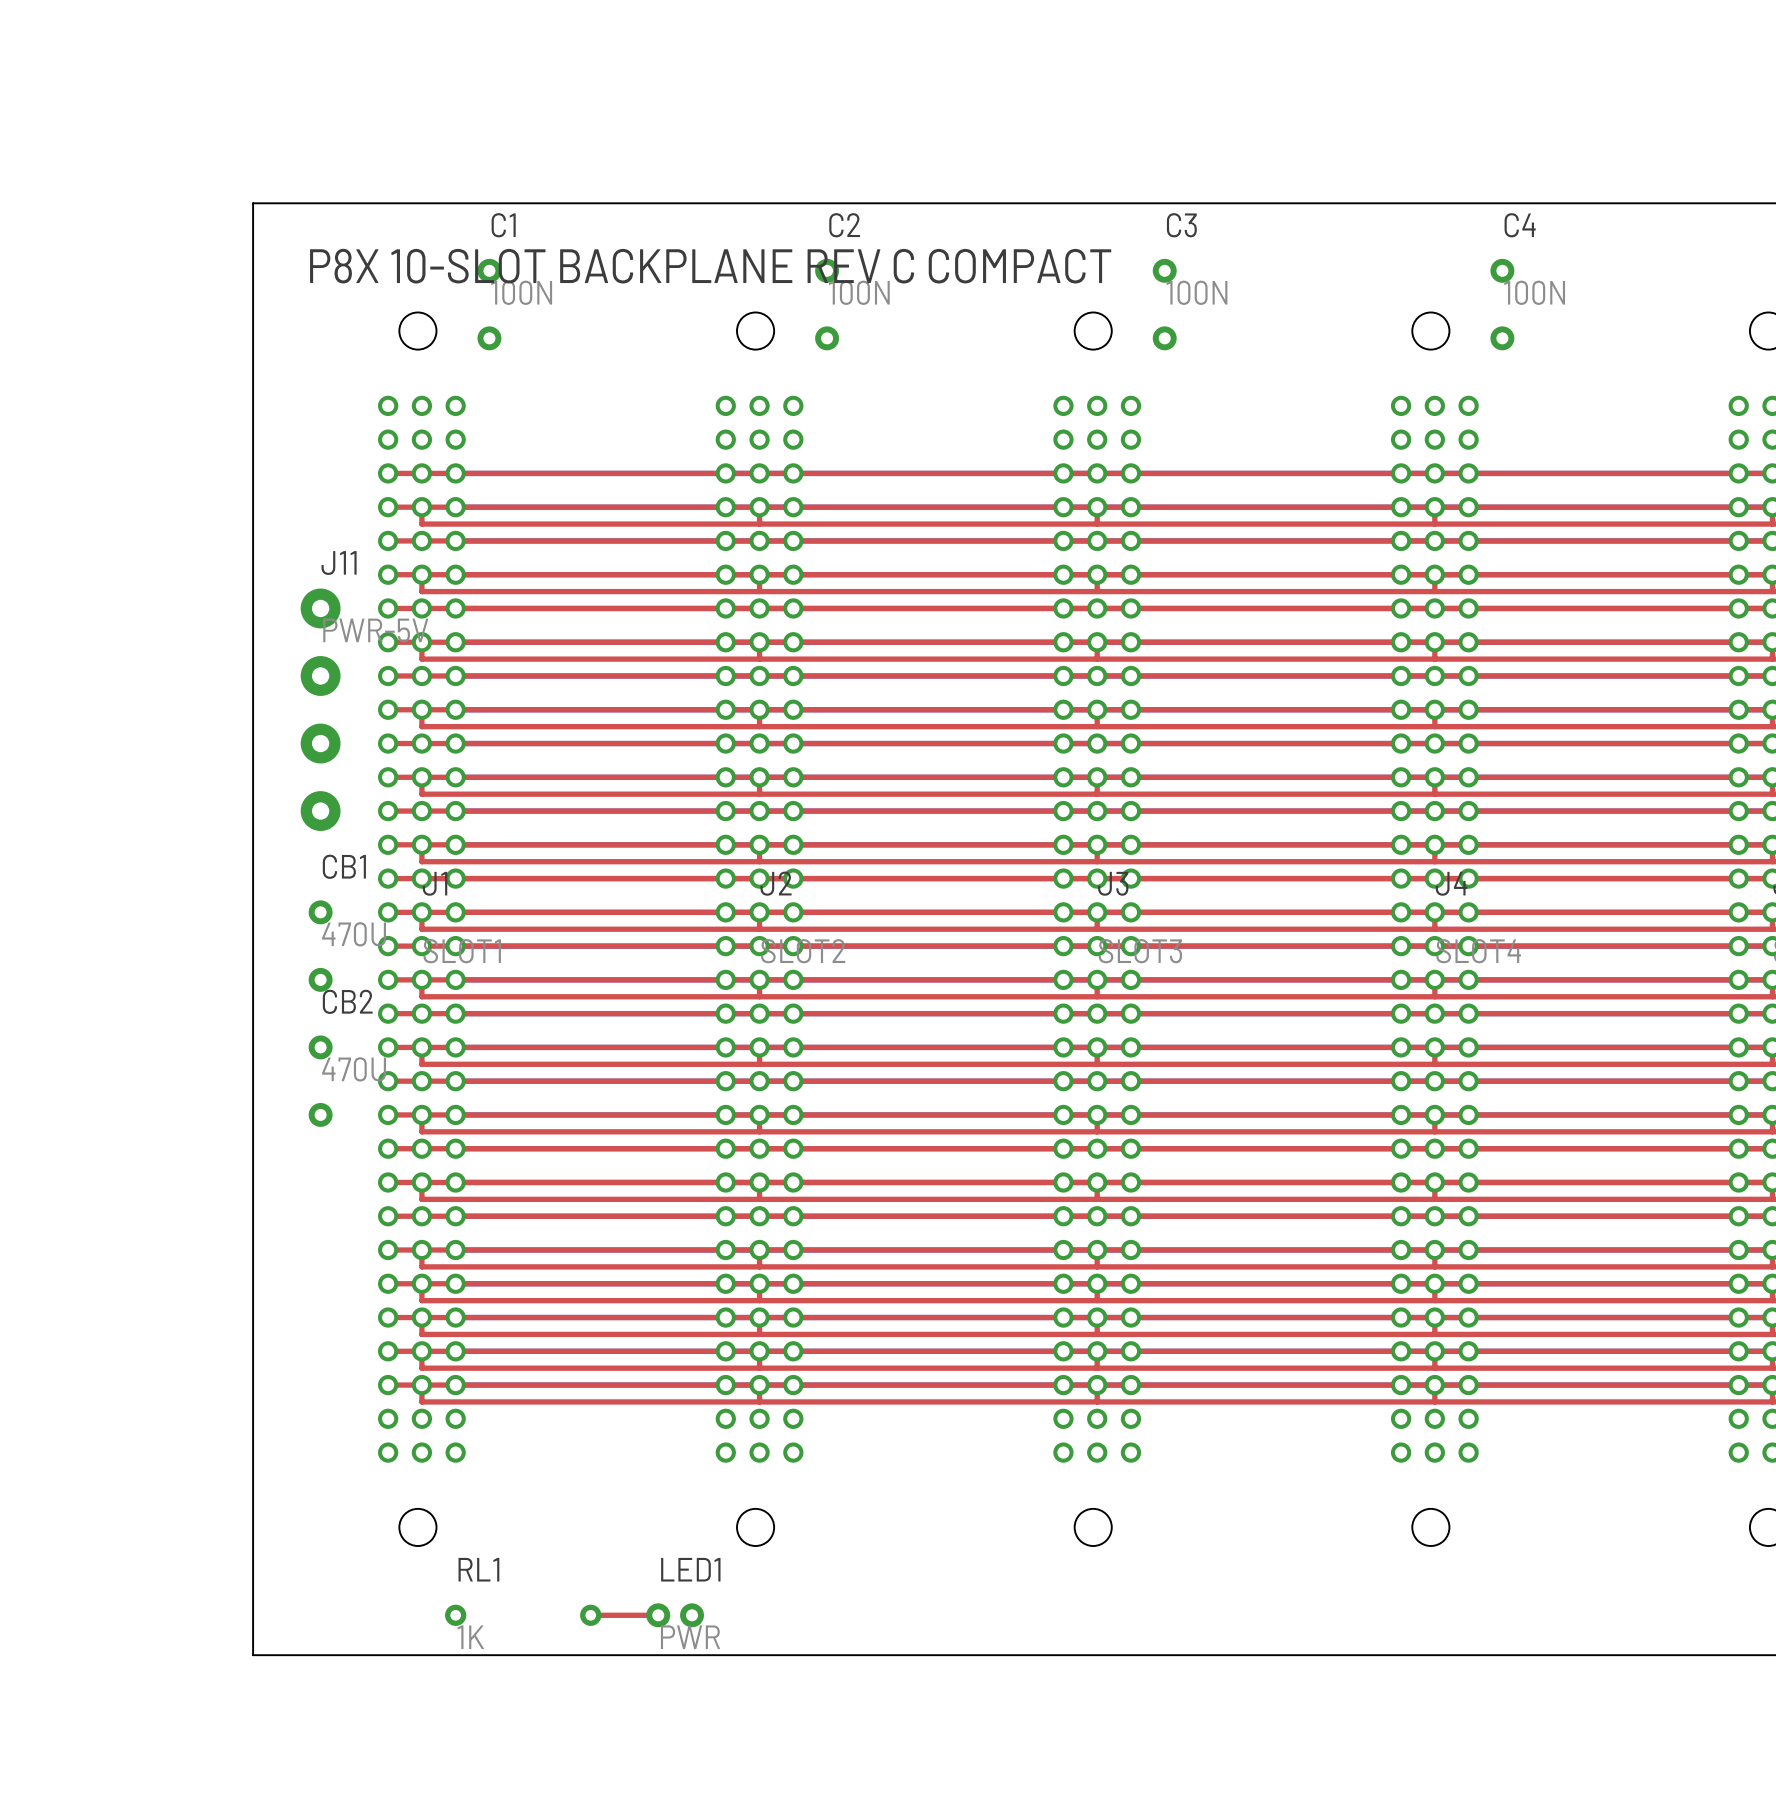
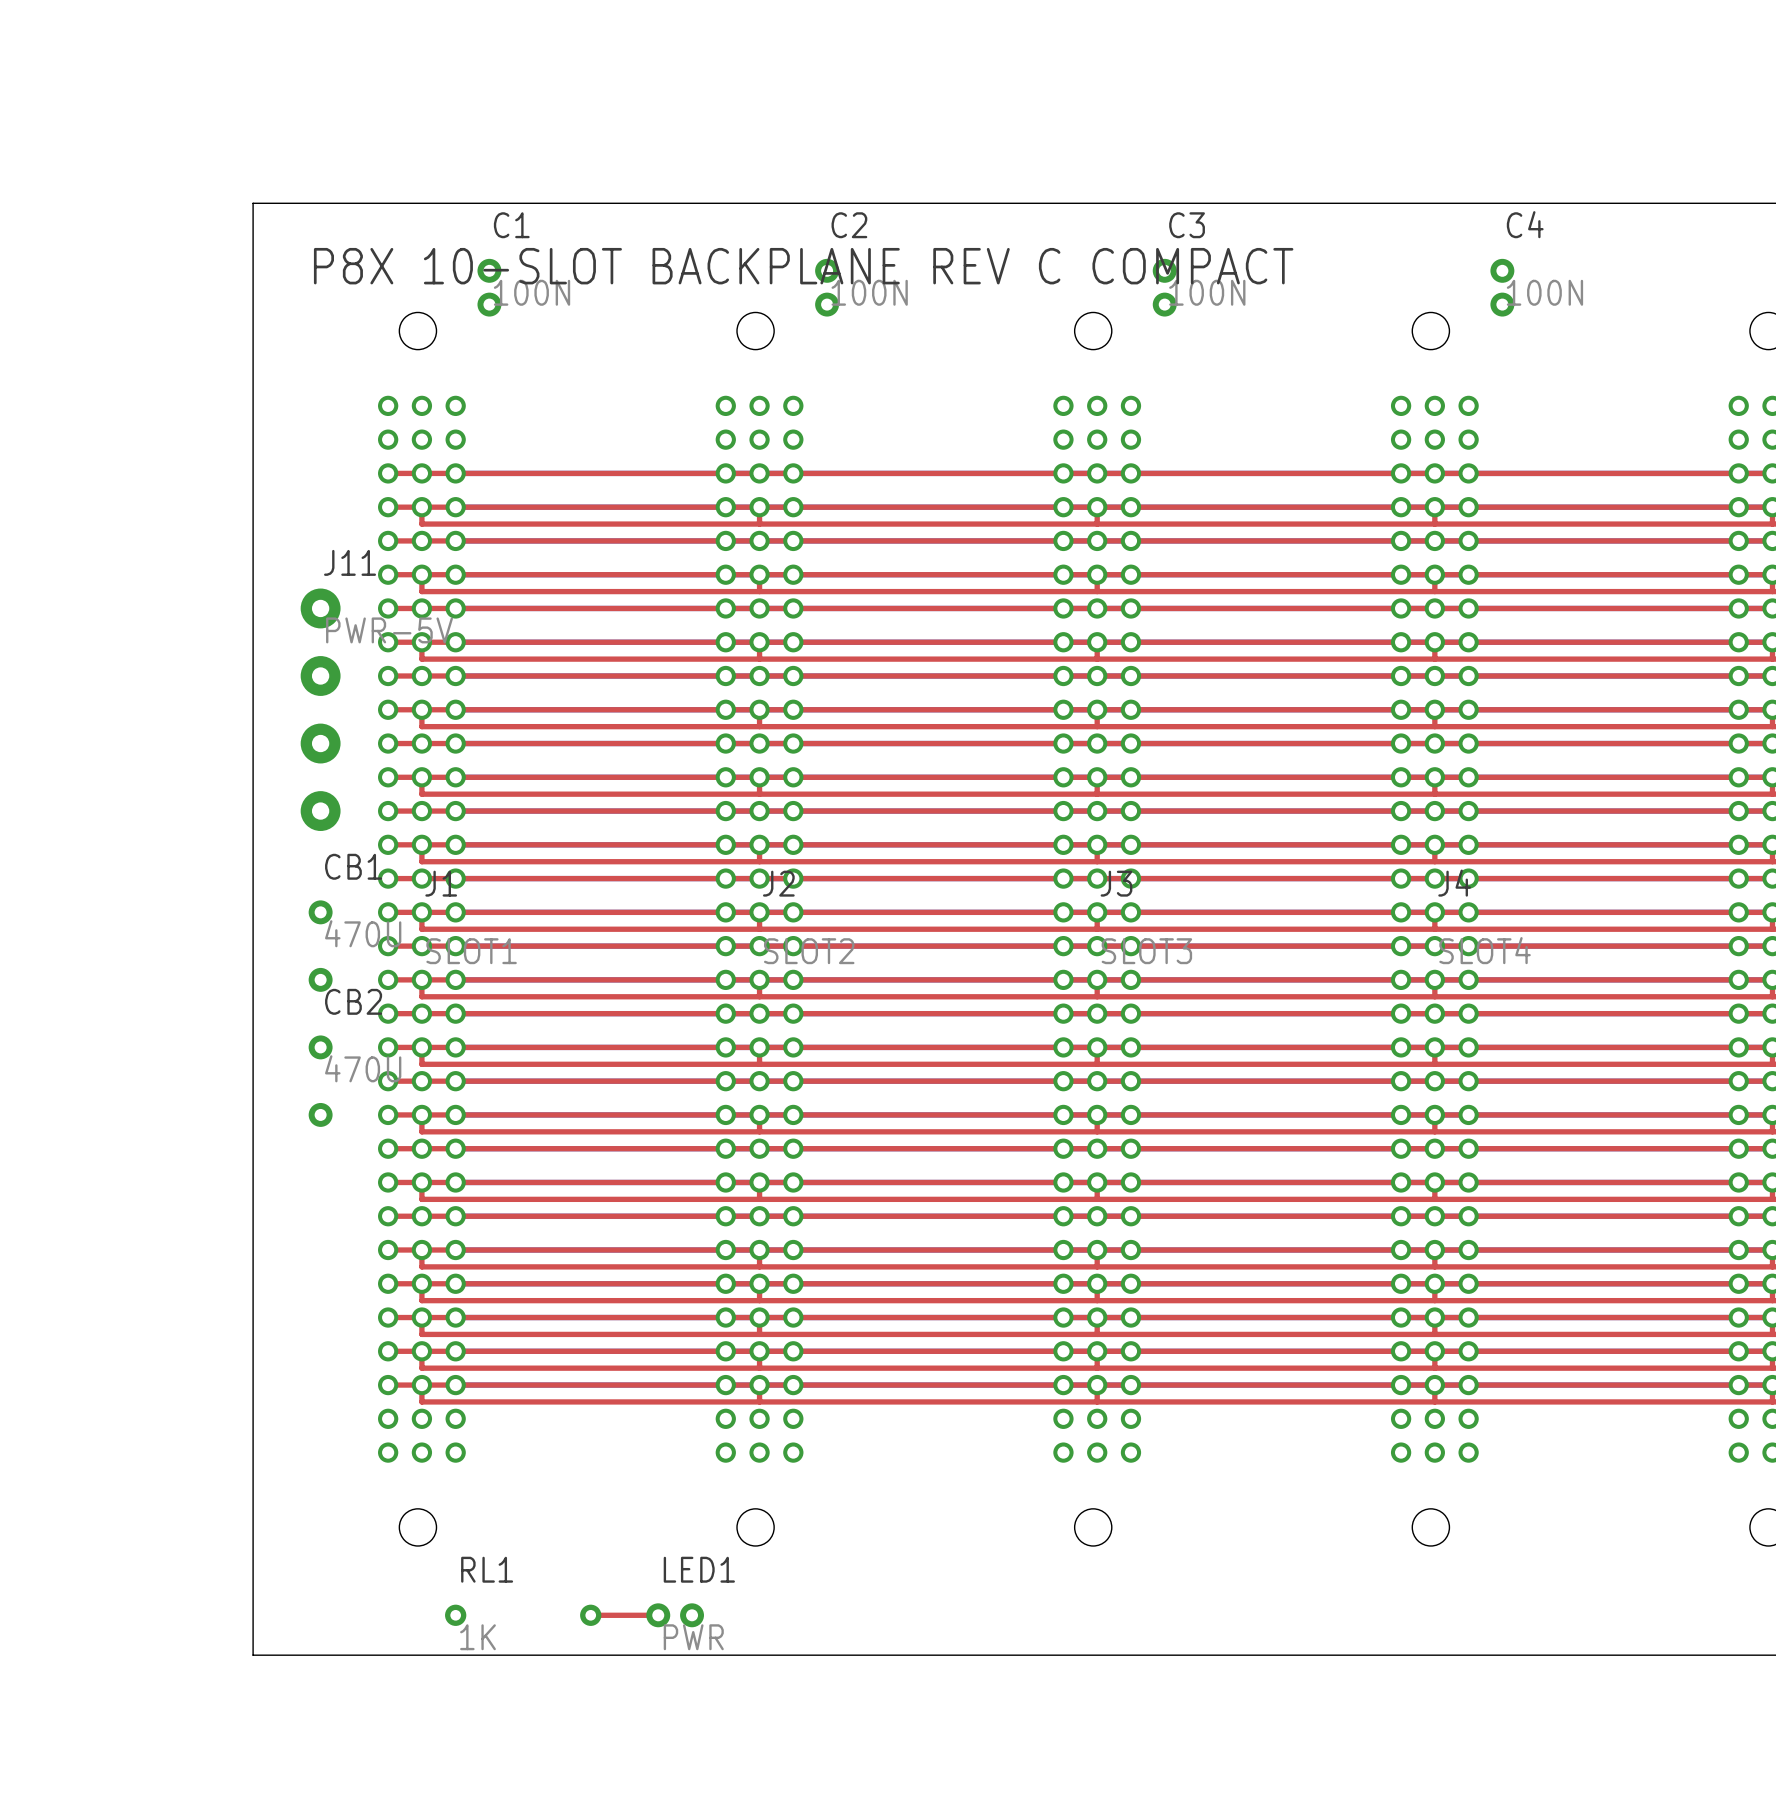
C1 footprint: [477, 258, 502, 351] -> [477, 258, 502, 317]
C2 footprint: [815, 258, 840, 351] -> [815, 258, 840, 317]
C3 footprint: [1152, 258, 1177, 351] -> [1152, 258, 1177, 317]
C4 footprint: [1490, 258, 1515, 351] -> [1490, 258, 1515, 317]

